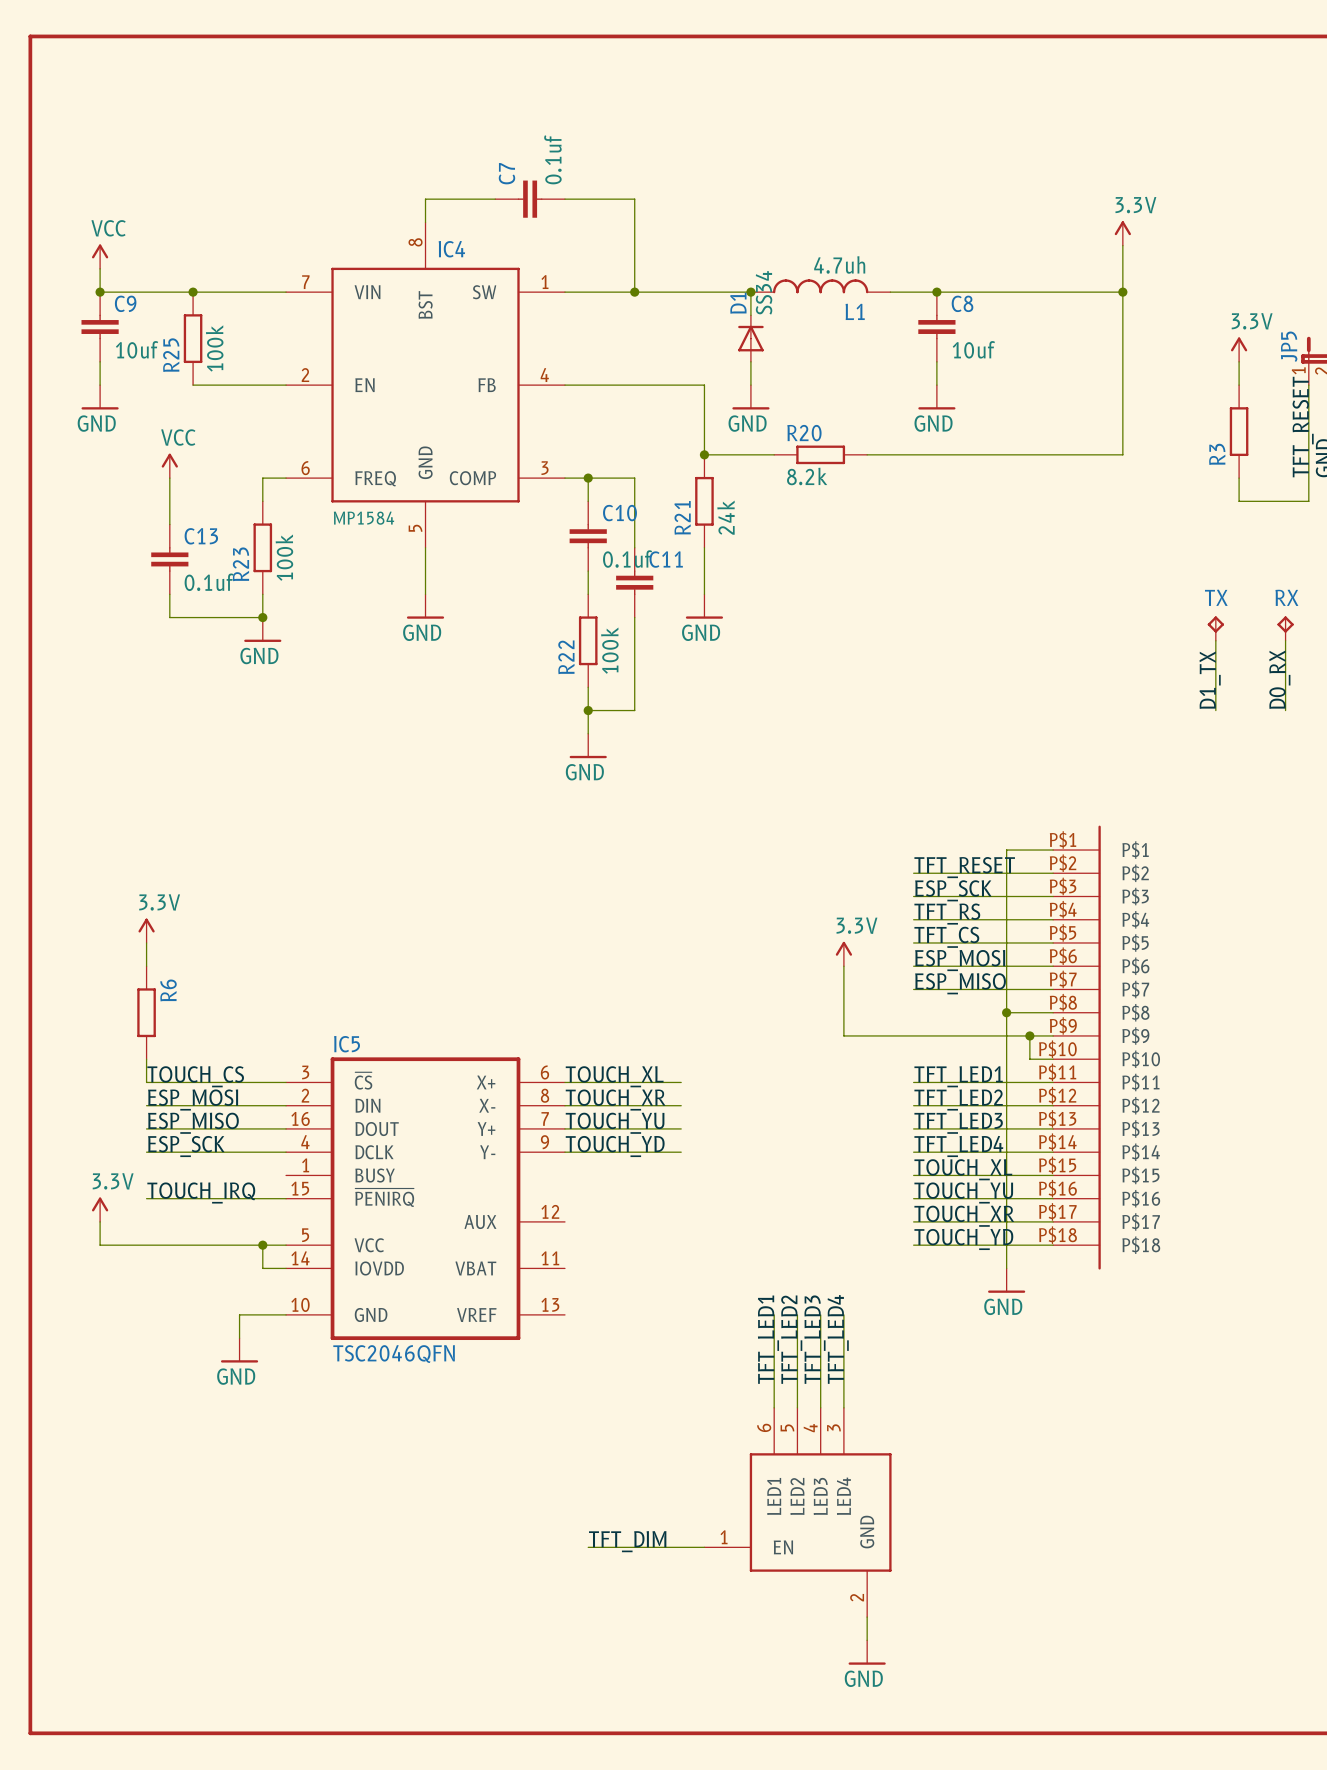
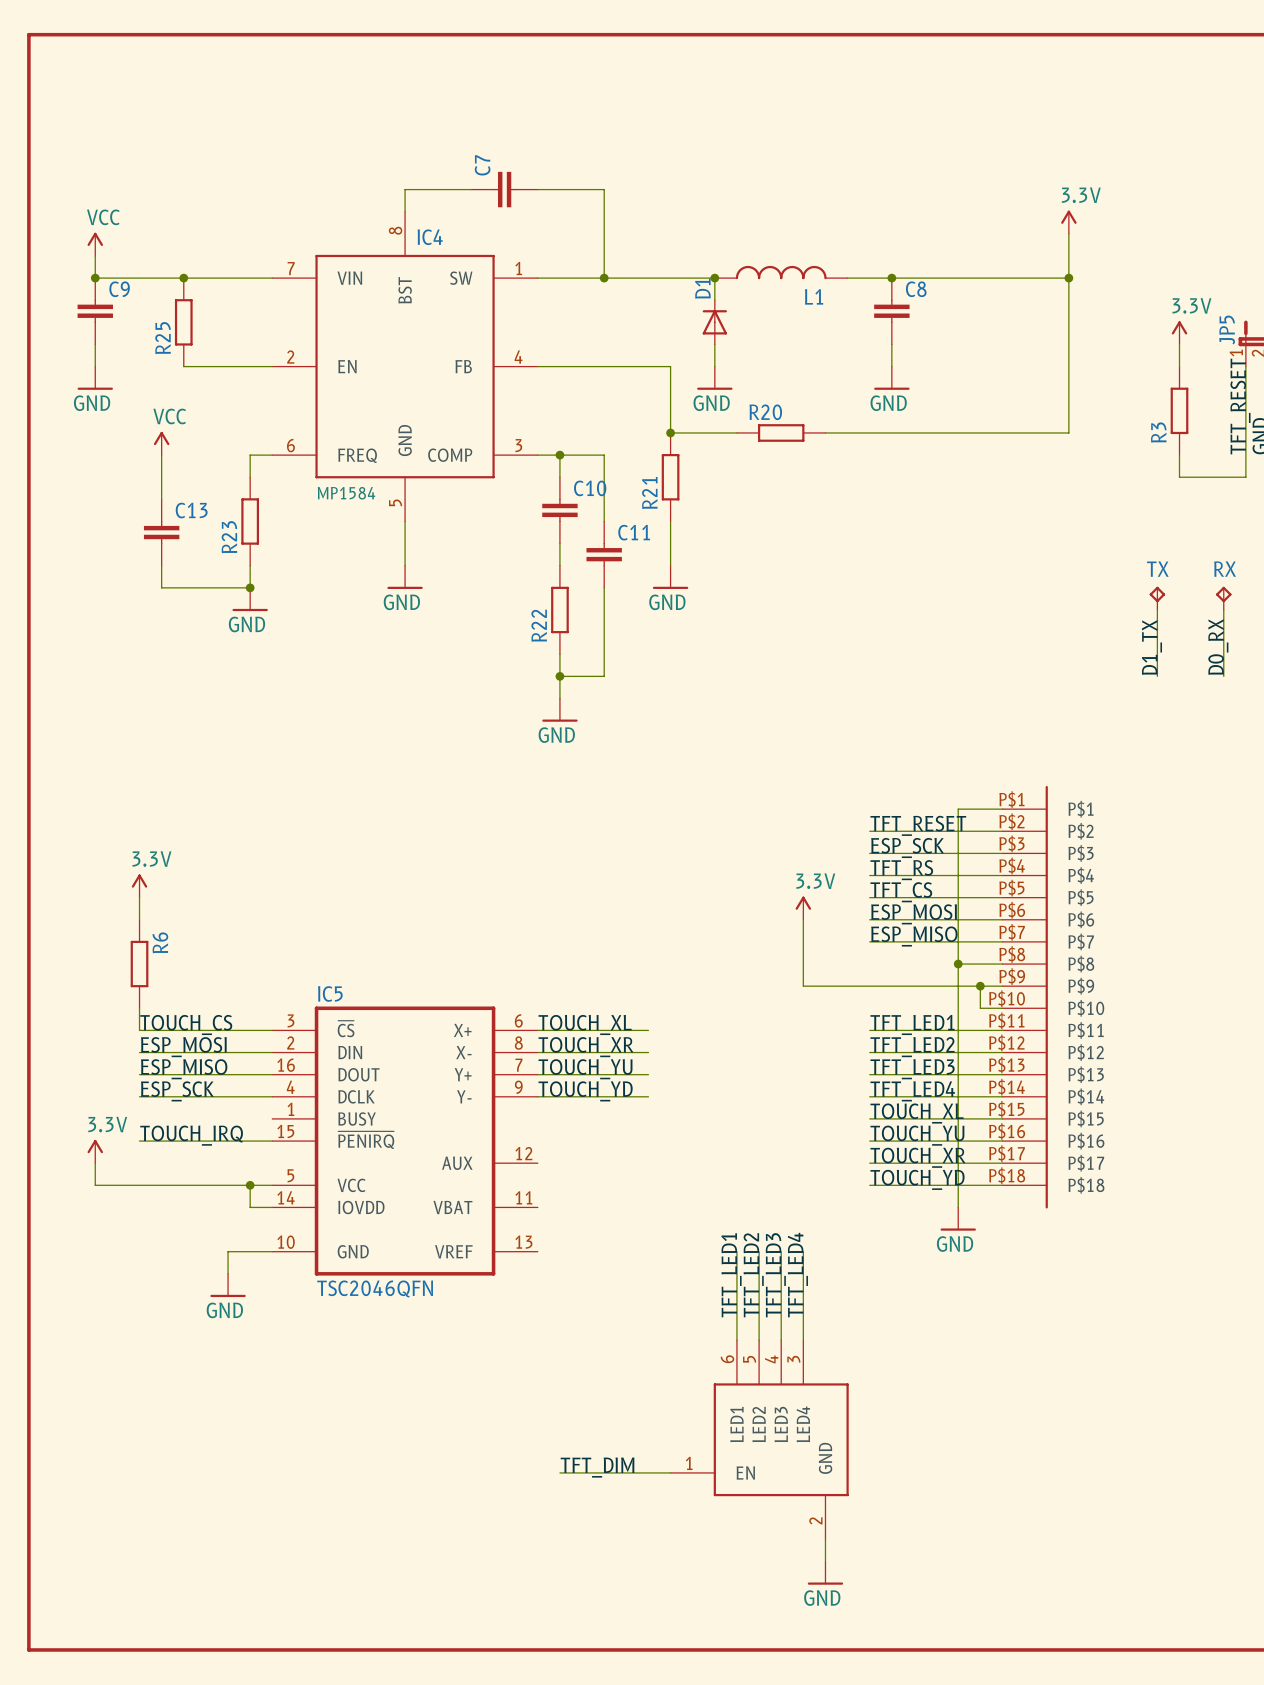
C7 value: 0.1uf (552, 159) -> none
L1 value: 4.7uh (839, 264) -> none
D1 value: SS34 (764, 292) -> none
R25 value: 100k (214, 348) -> none
C9 value: 10uf (137, 349) -> none
C8 value: 10uf (973, 349) -> none
R20 value: 8.2k (807, 476) -> none
R21 value: 24k (725, 517) -> none
R23 value: 100k (284, 557) -> none
C10 value: 0.1uf (627, 559) -> none
C13 value: 0.1uf (209, 582) -> none
R22 value: 100k (609, 650) -> none

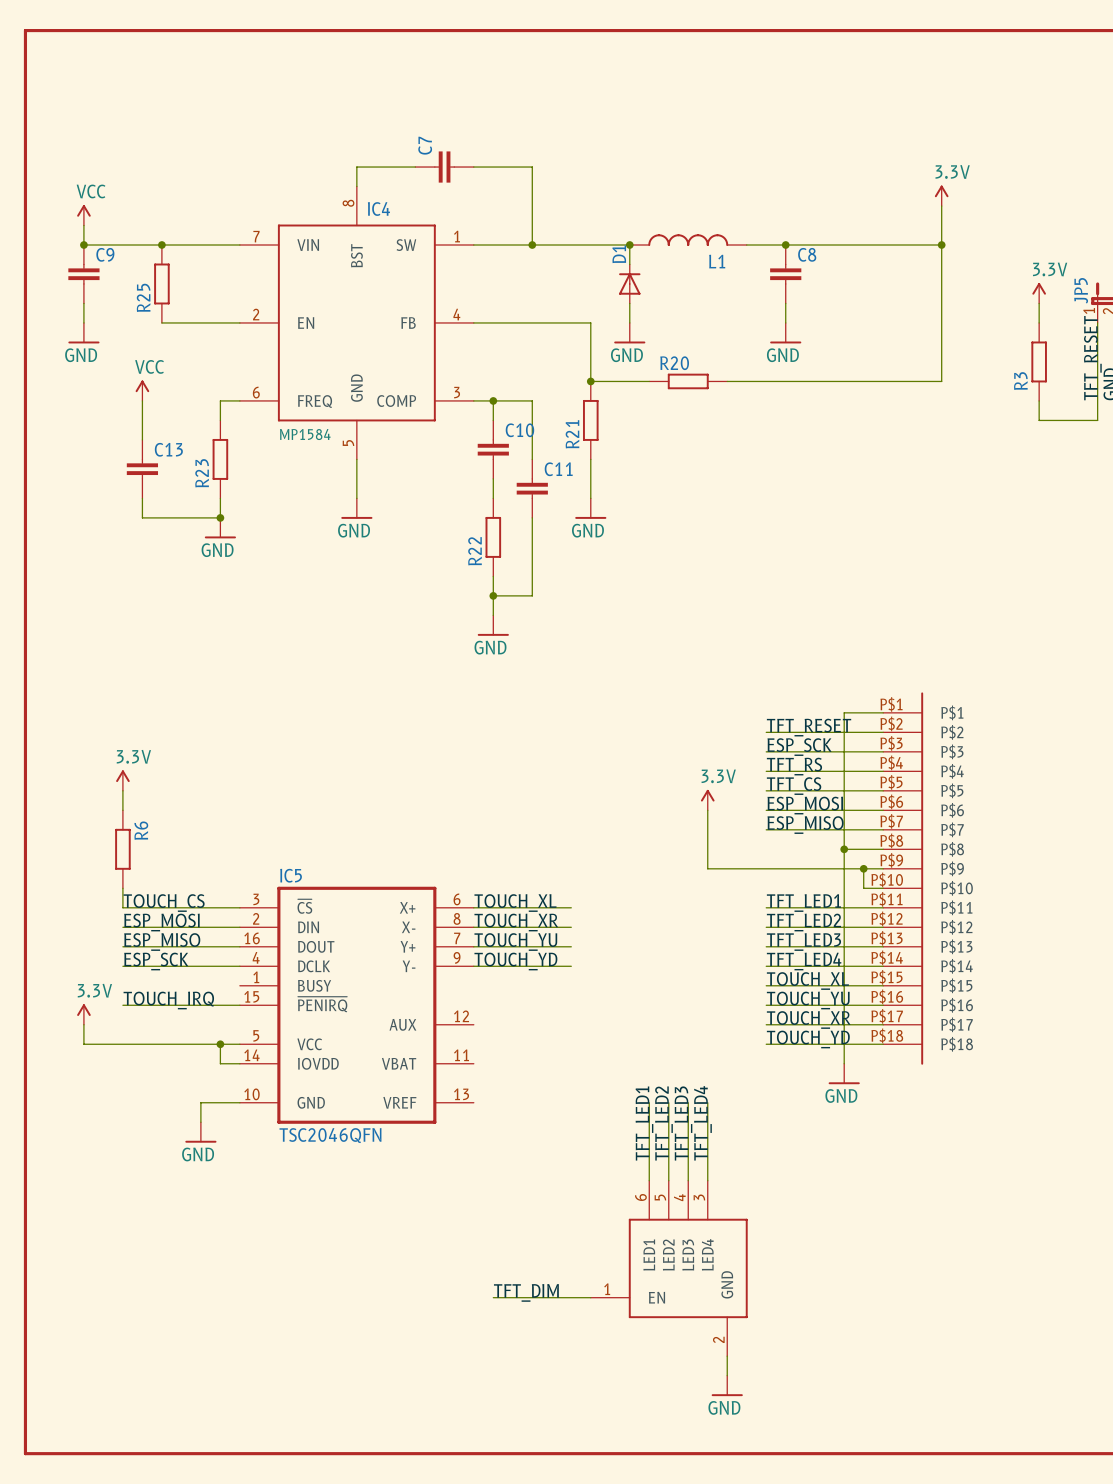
TX: (1157, 598) -> none
RX: (1223, 598) -> none
wire: (1157, 610) (1157, 676) -> none
wire: (1223, 610) (1223, 676) -> none
label: D1_TX (1151, 647) -> none
label: D0_RX (1218, 647) -> none

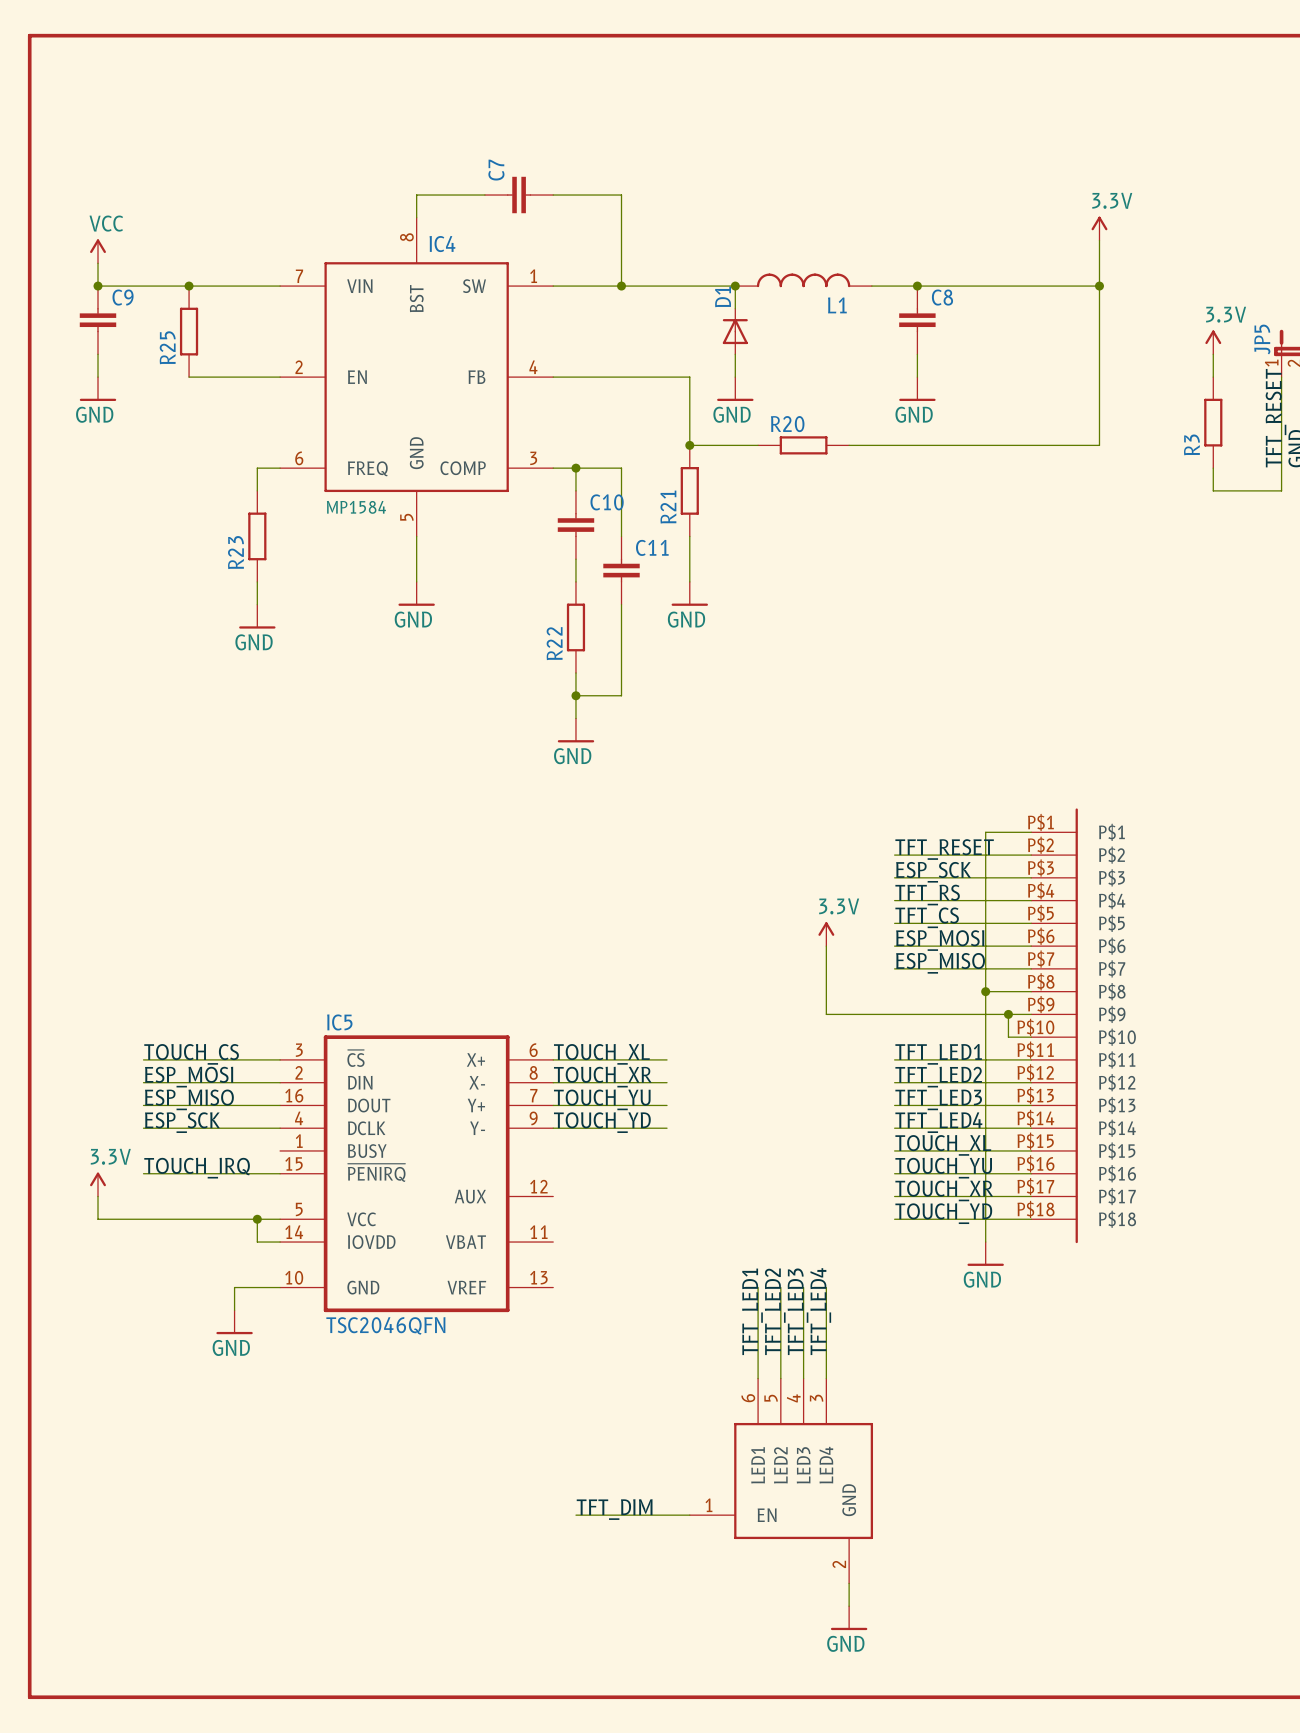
power symbol: VCC (142, 390) -> none
wire: (142, 400) (142, 439) -> none
C13: (142, 469) -> none
wire: (142, 498) (142, 517) (220, 517) -> none
junction: (220, 517) -> none
power symbol: 3.3V (122, 780) -> none
wire: (122, 790) (122, 810) -> none
R6: (122, 849) -> none
wire: (122, 888) (122, 907) -> none

